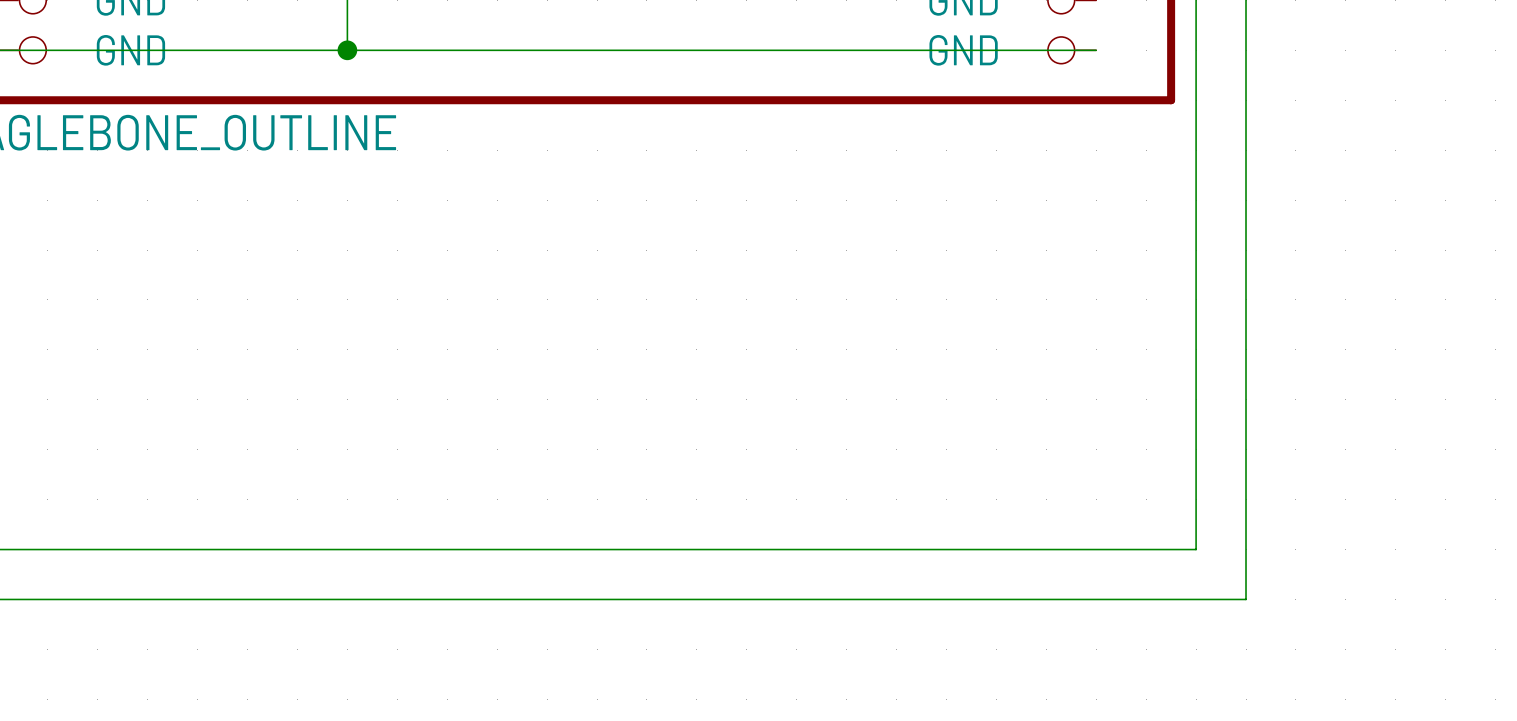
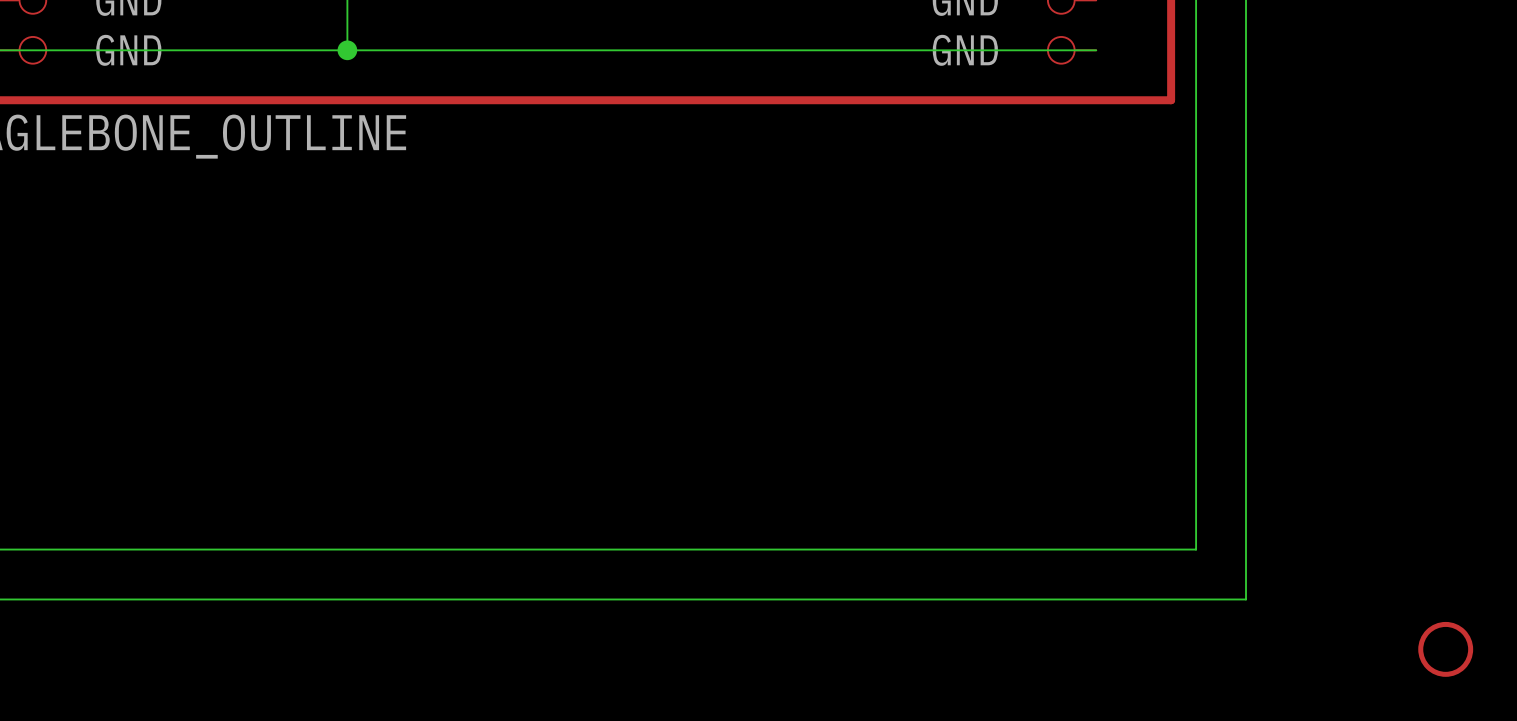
part: none -> (1445, 649)

